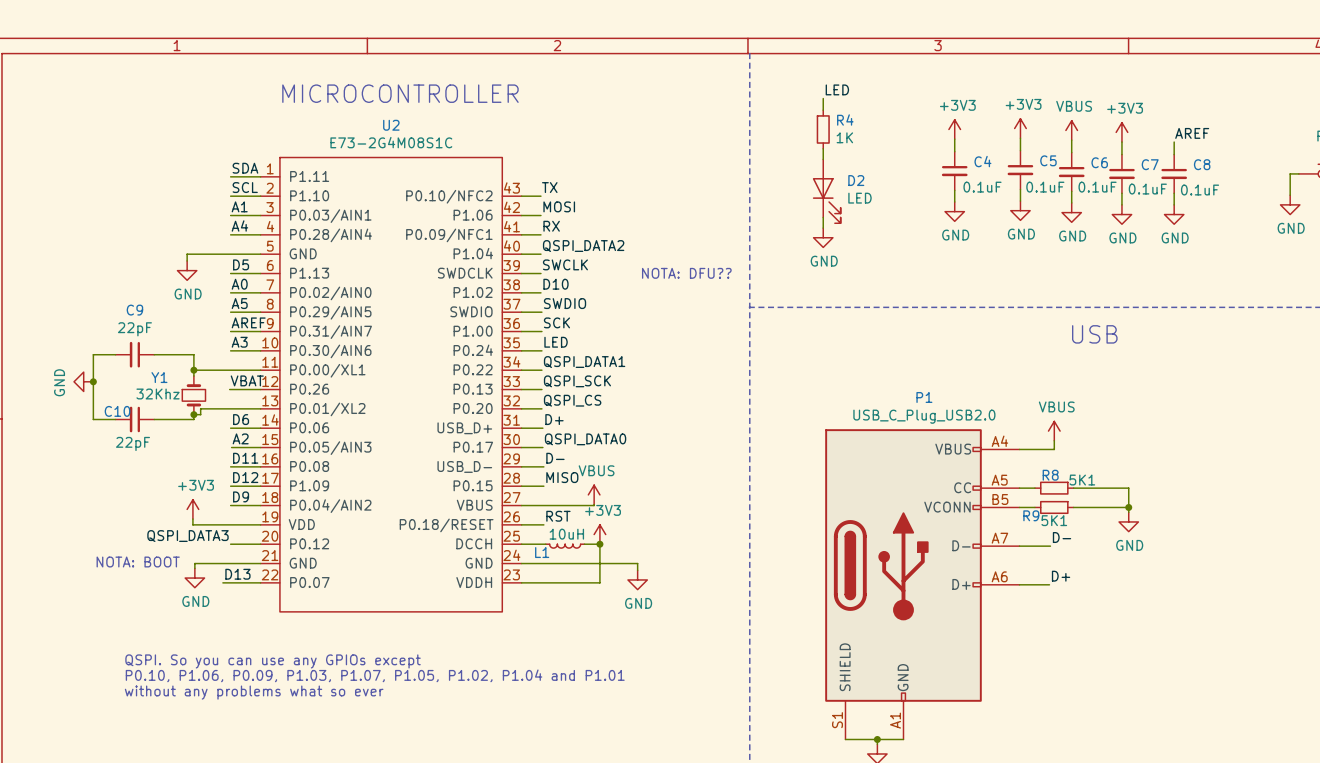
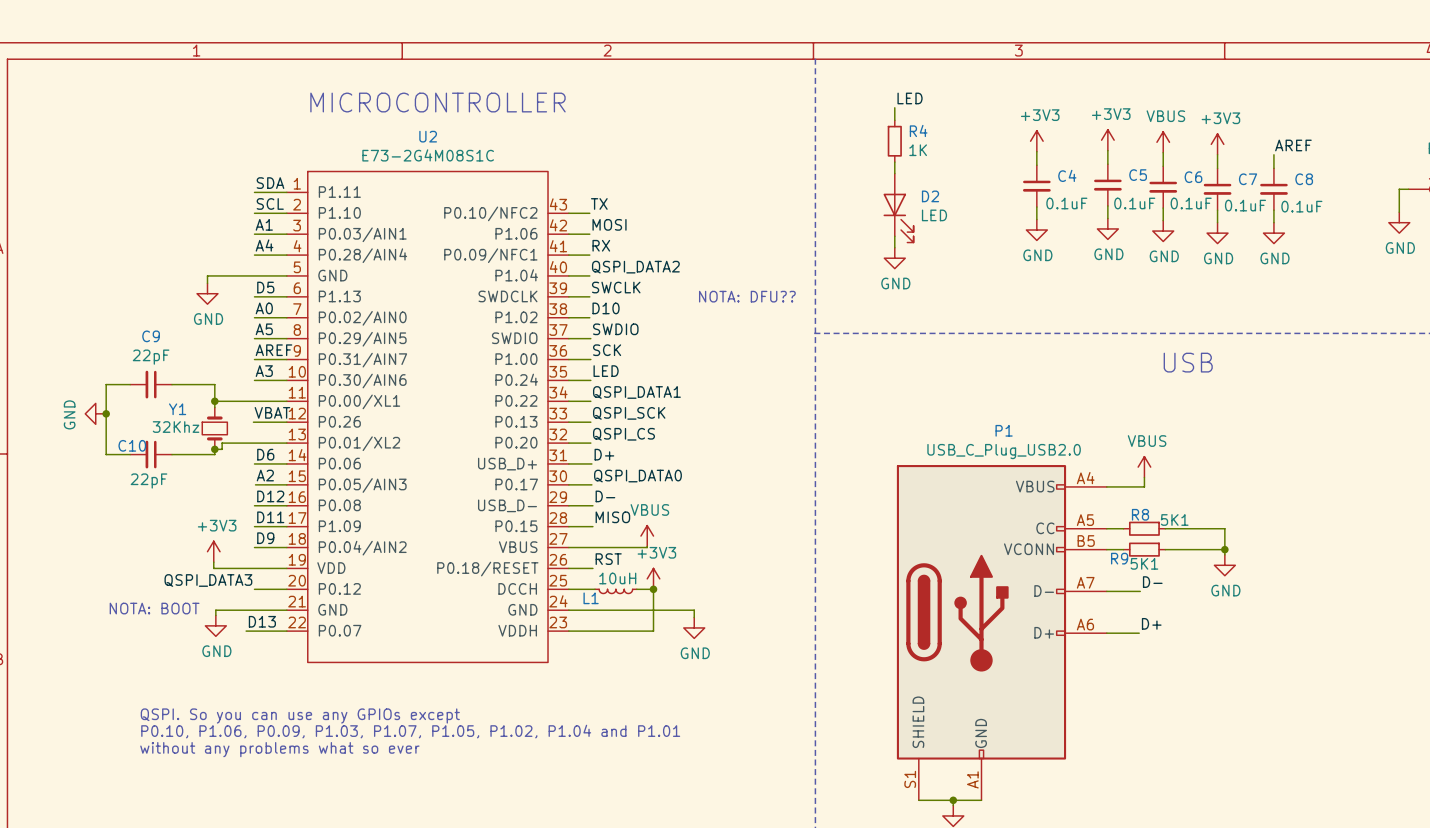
label: D11 (245, 458) -> D12 (270, 496)
label: D12 (245, 477) -> D11 (270, 517)

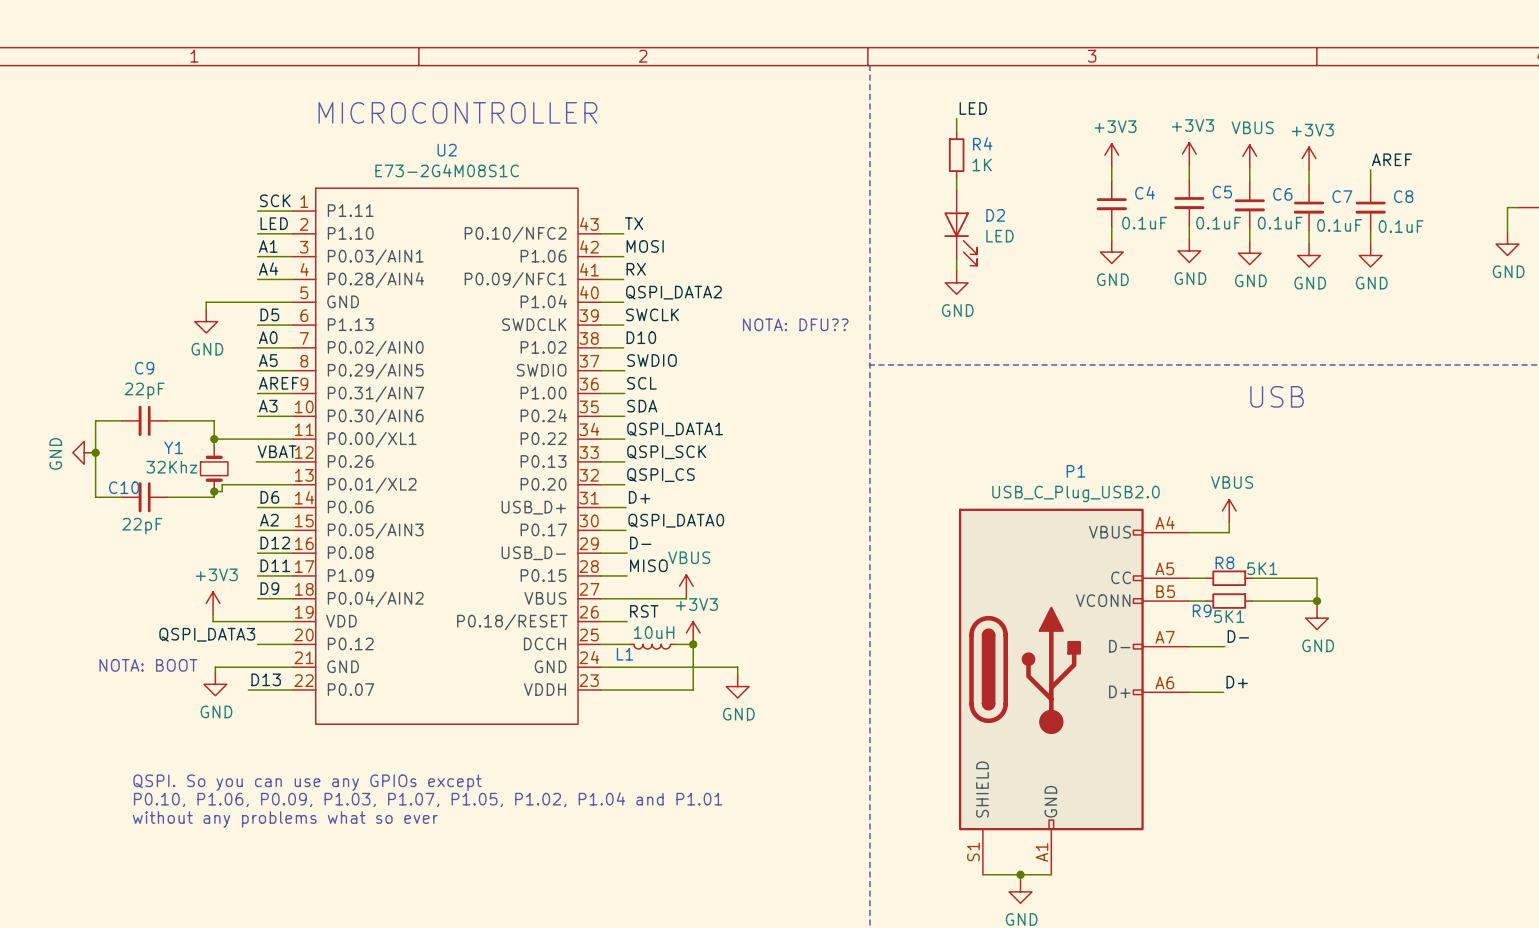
label: SDA (270, 183) -> SCK (275, 200)
label: SCL (270, 203) -> LED (274, 223)
label: SCK (607, 350) -> SCL (641, 383)
label: LED (606, 371) -> SDA (642, 406)

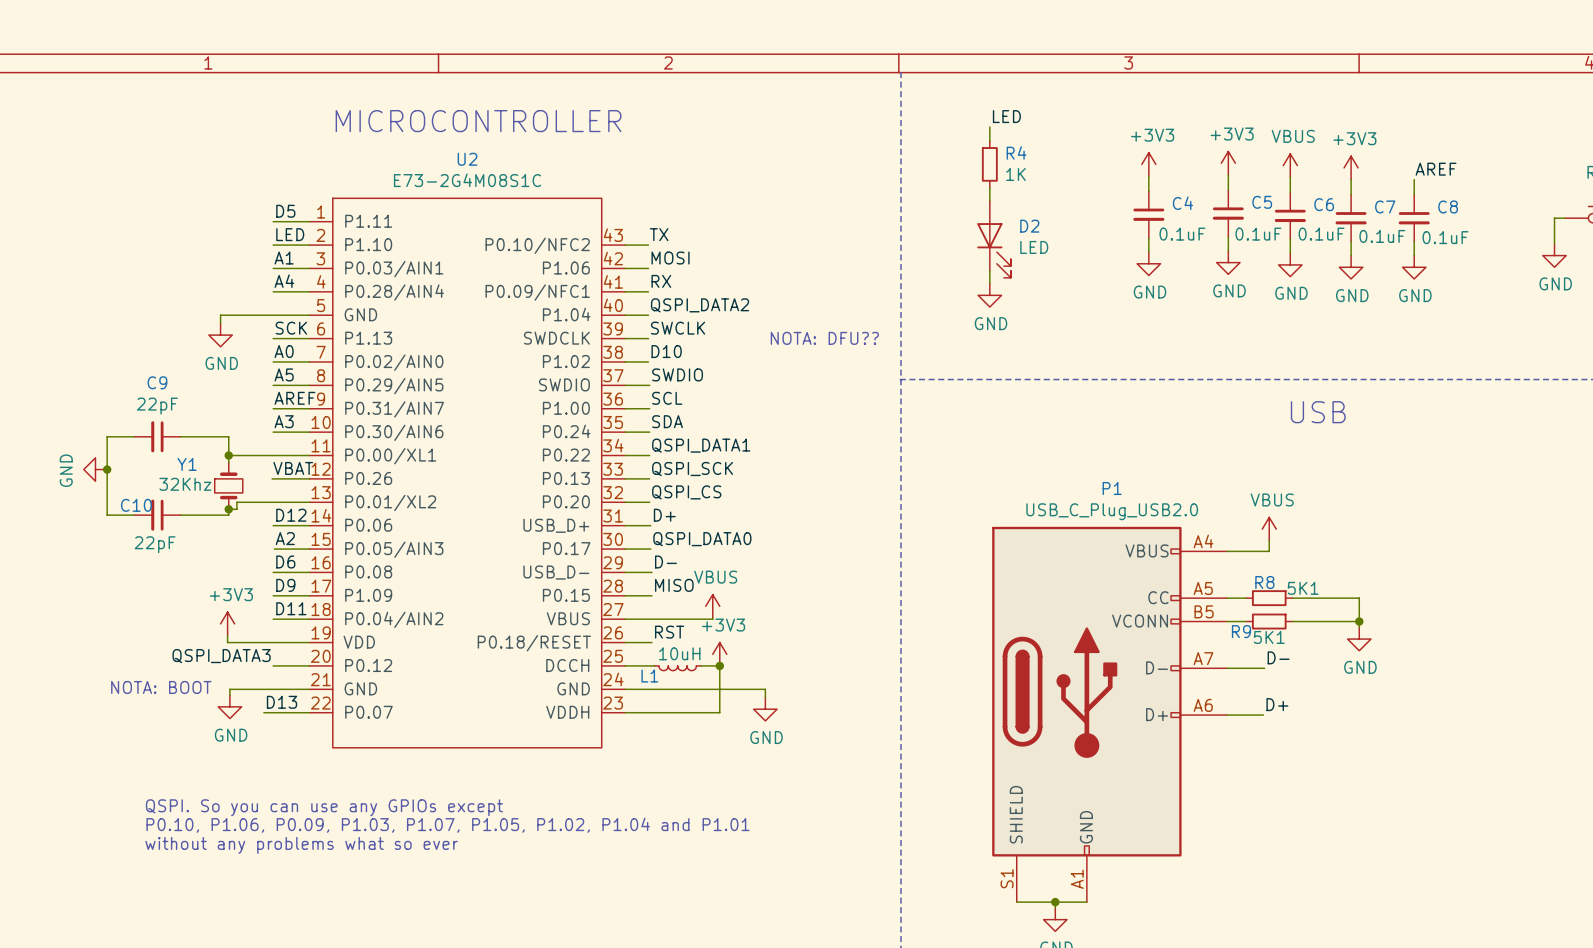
label: SCK (275, 200) -> D5 (285, 211)
label: D5 (269, 314) -> SCK (291, 328)
label: D6 (269, 497) -> D12 (291, 515)
label: D12 (275, 542) -> D6 (285, 561)
label: D11 (275, 565) -> D9 (285, 585)
label: D9 (269, 588) -> D11 (291, 608)

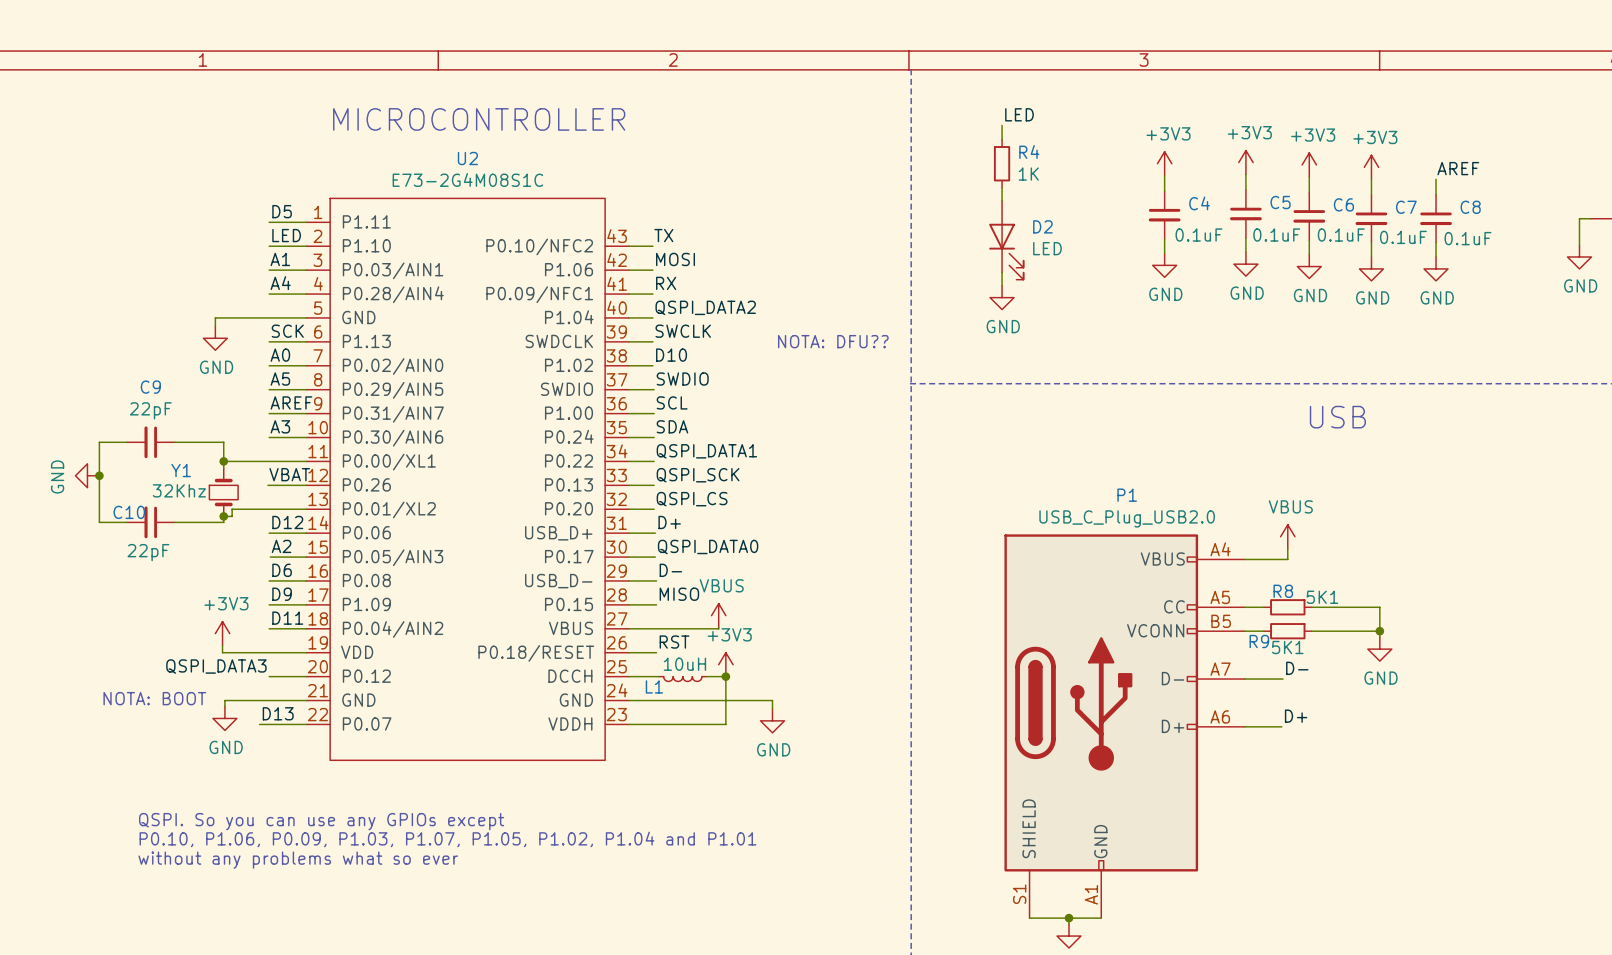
power symbol: VBUS (1290, 165) -> +3V3 (1309, 164)

